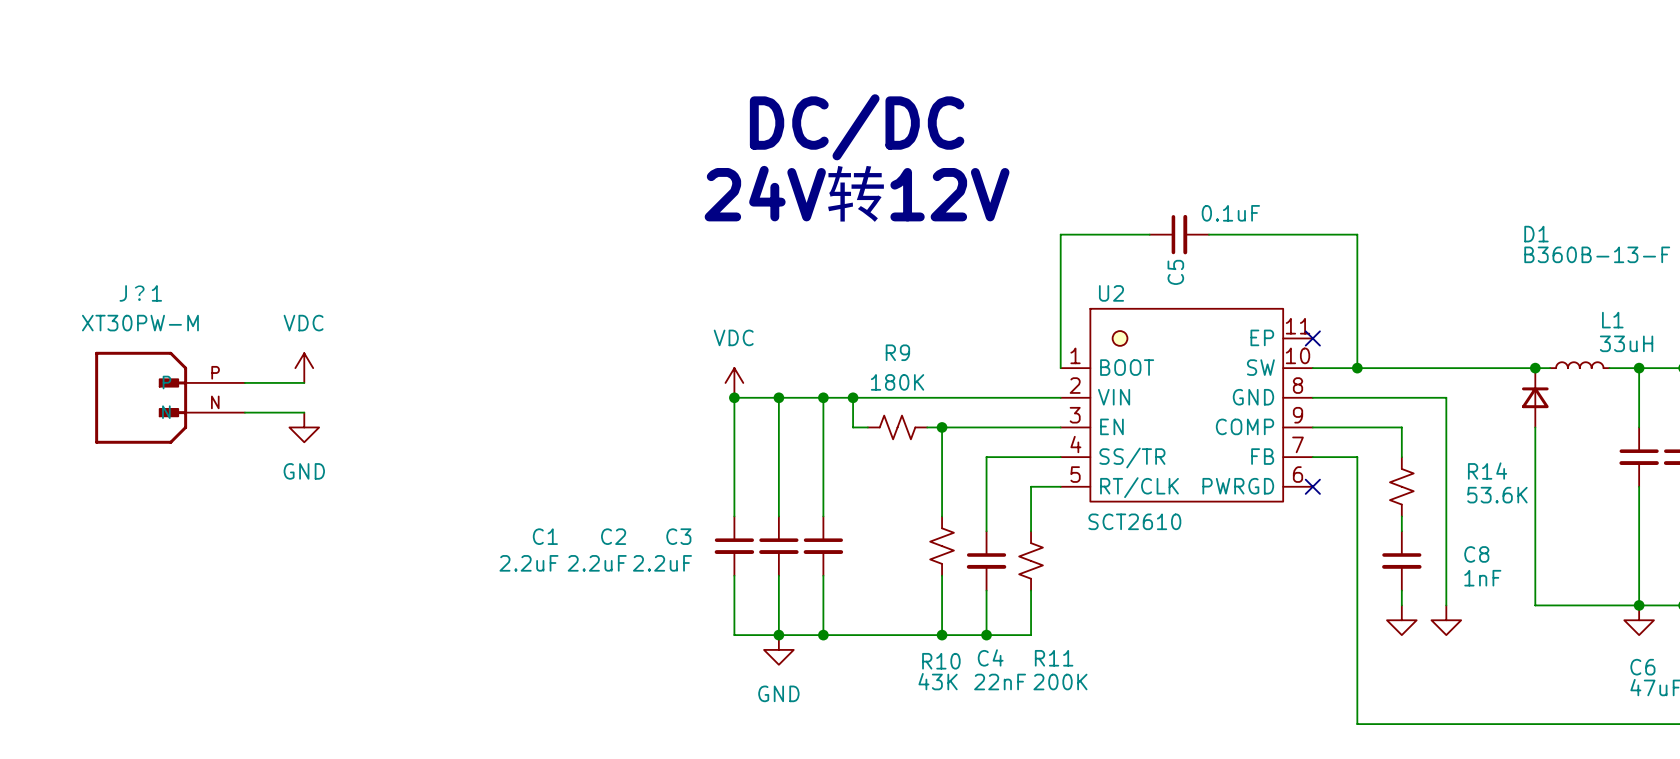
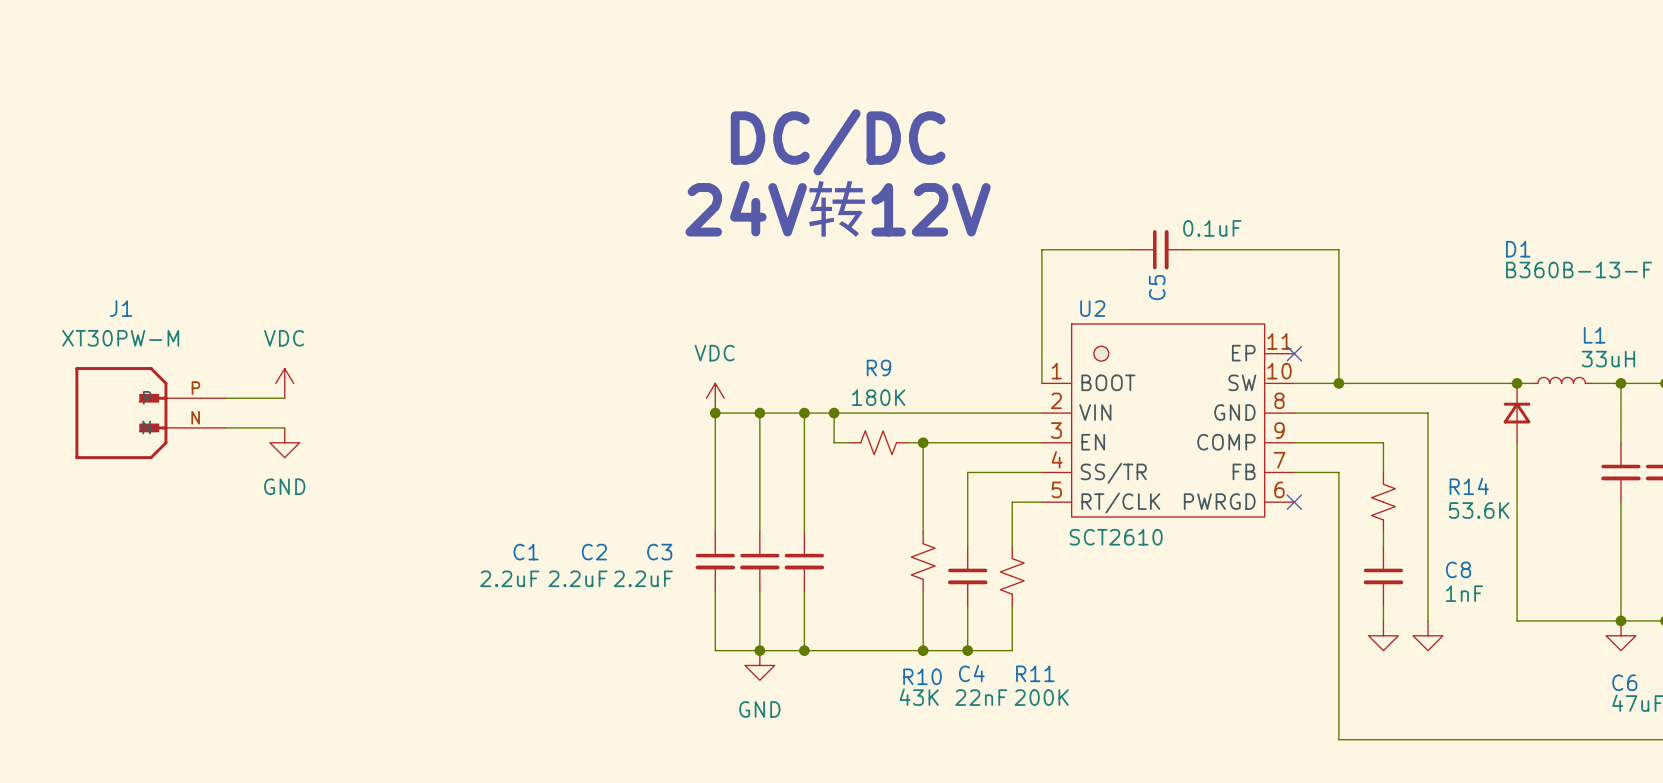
J？1 name: J？1 (140, 293) -> J1 (121, 308)

